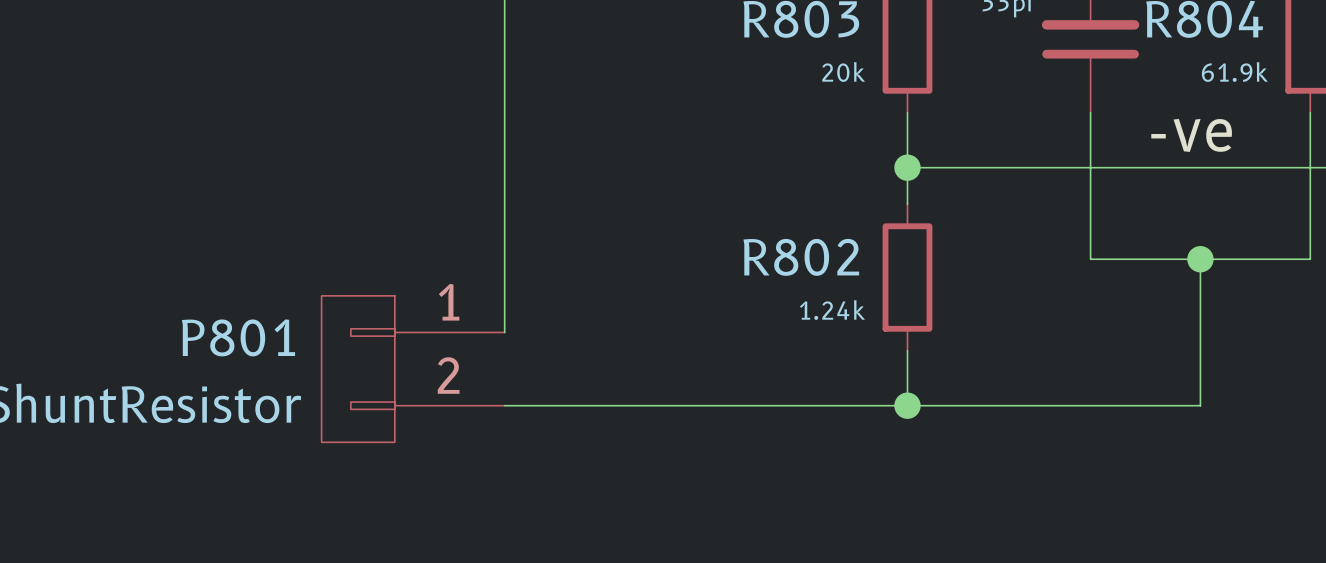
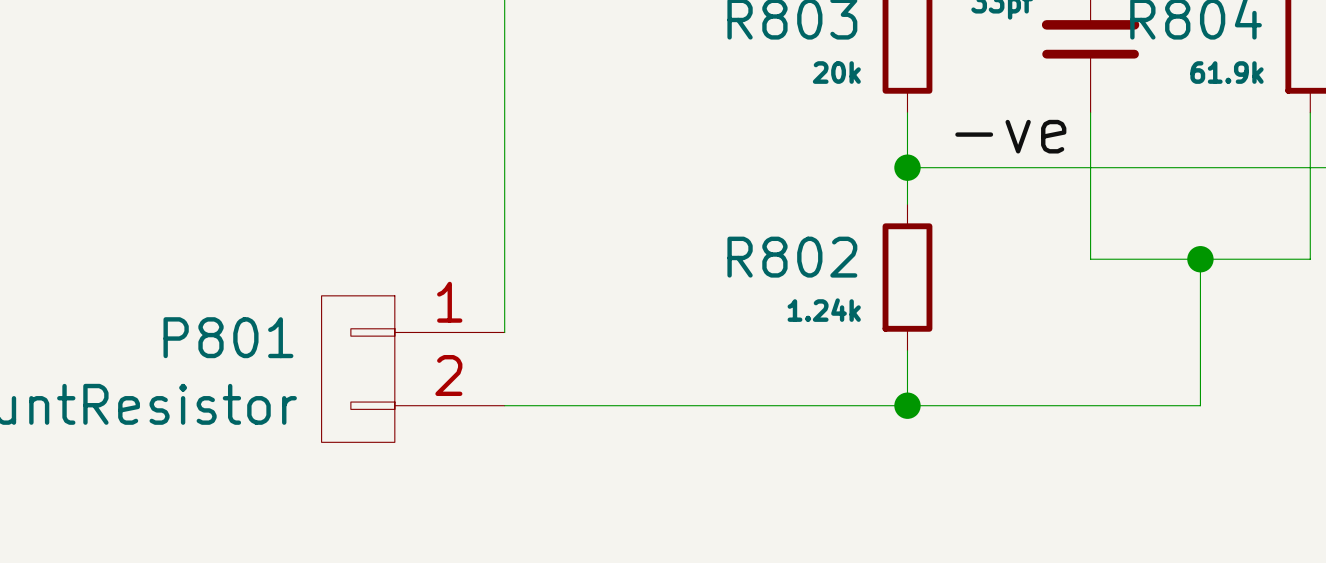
label position: -ve (1191, 135) -> -ve (1010, 136)

